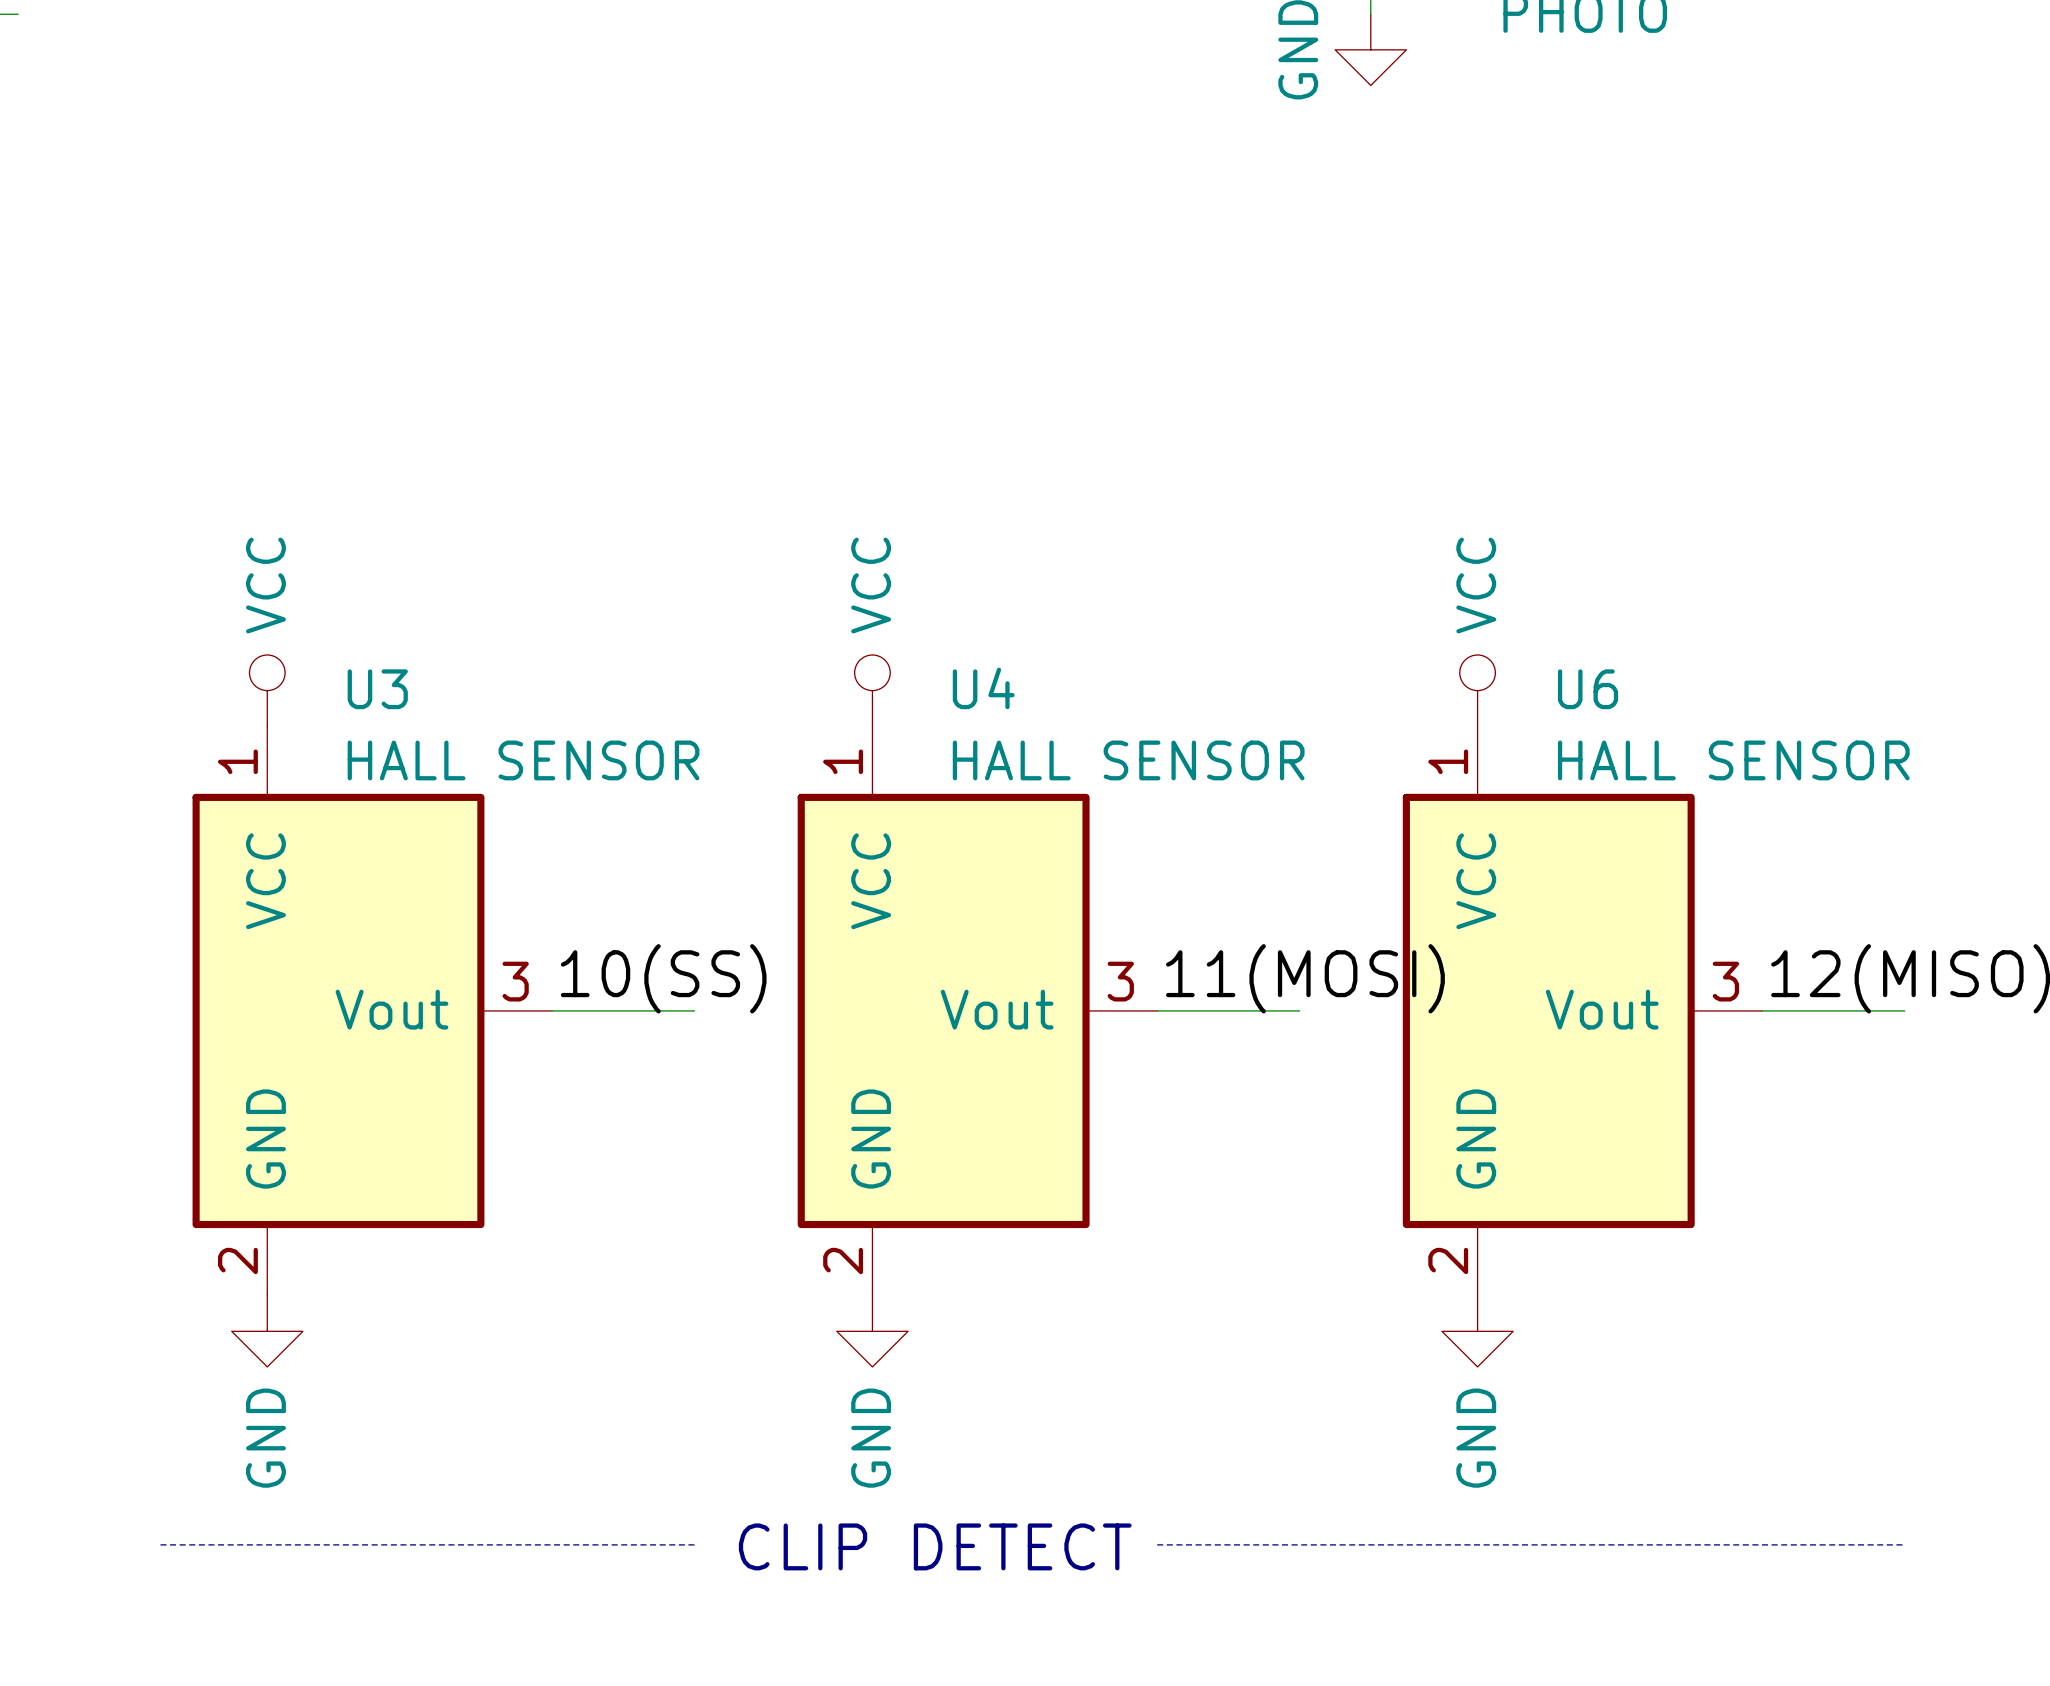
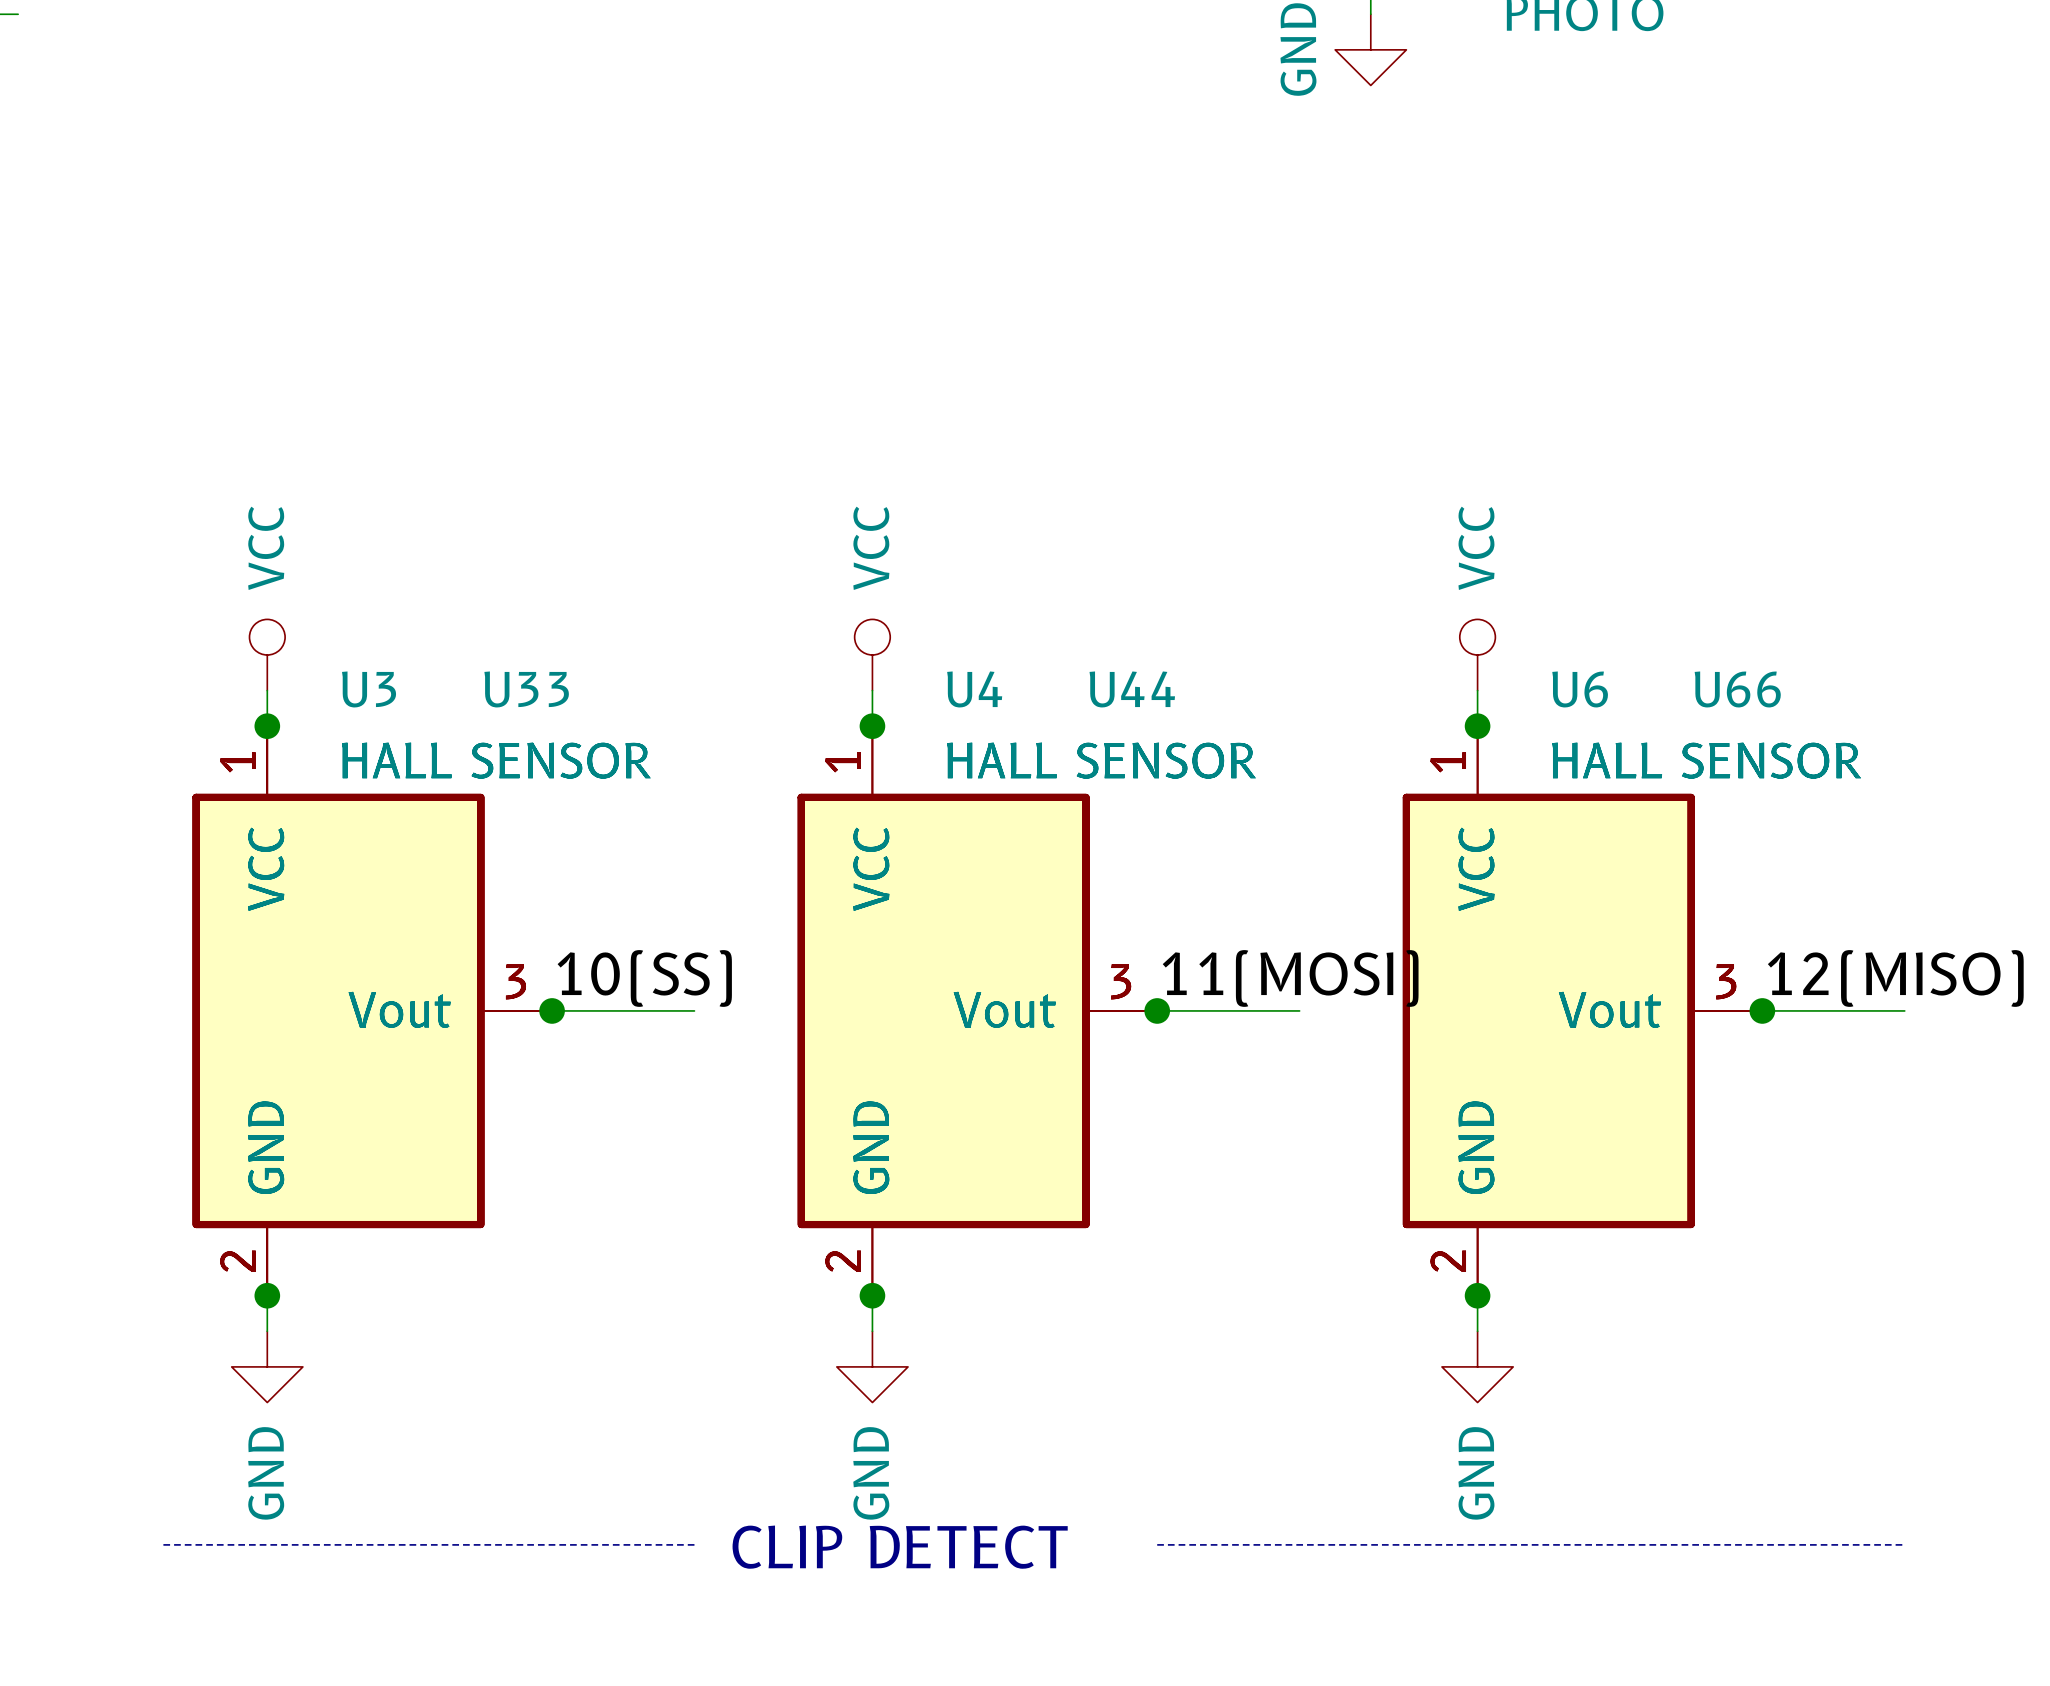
power symbol position: VCC (267, 690) -> VCC (267, 655)
power symbol position: VCC (872, 690) -> VCC (872, 655)
power symbol position: VCC (1477, 690) -> VCC (1477, 655)
junction: none -> (267, 726)
junction: none -> (872, 726)
junction: none -> (1477, 726)
U33: none -> HALL SENSOR (372, 1010)
junction: none -> (552, 1010)
U44: none -> HALL SENSOR (977, 1010)
junction: none -> (1157, 1010)
U66: none -> HALL SENSOR (1582, 1010)
junction: none -> (1762, 1010)
junction: none -> (267, 1295)
junction: none -> (872, 1295)
junction: none -> (1477, 1295)
power symbol position: GND (267, 1331) -> GND (267, 1366)
power symbol position: GND (872, 1331) -> GND (872, 1366)
power symbol position: GND (1477, 1331) -> GND (1477, 1366)

